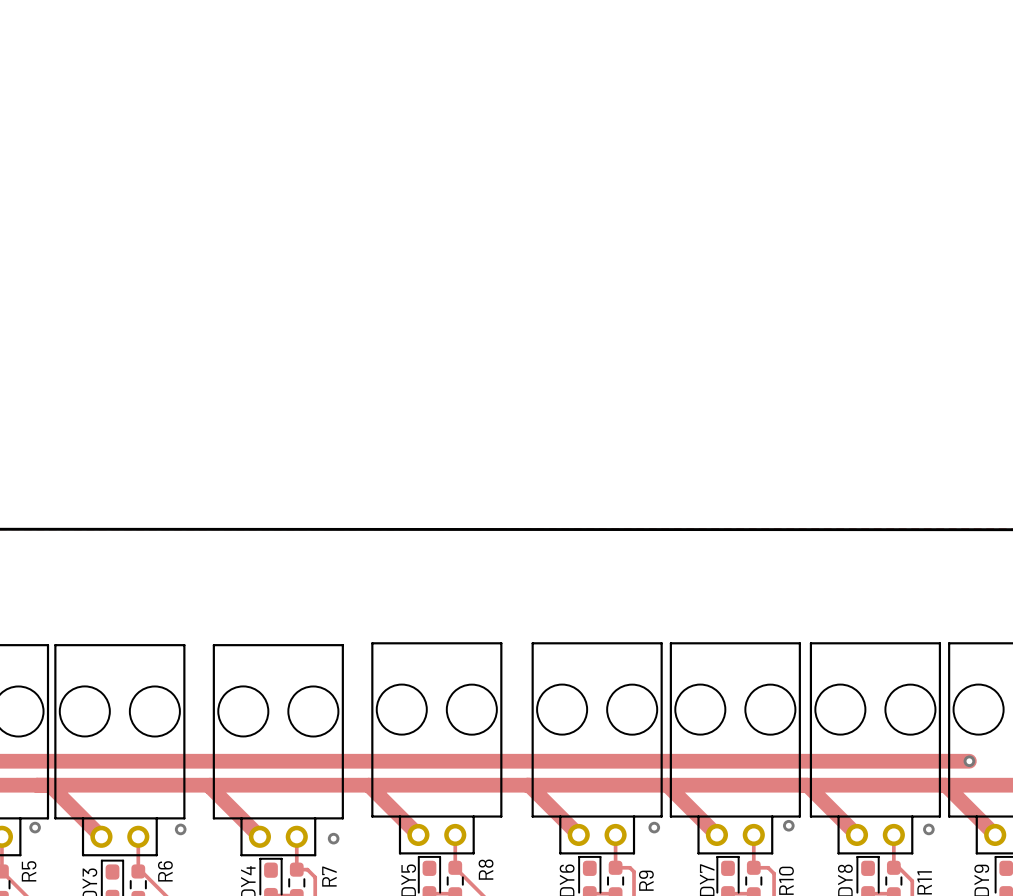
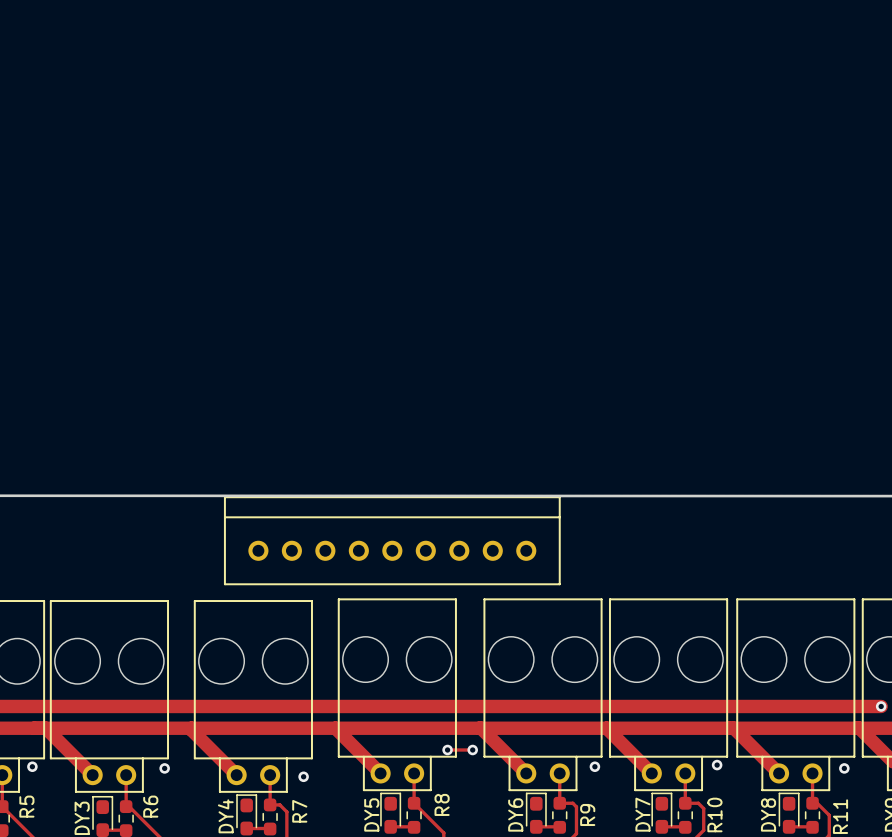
part: none -> (392, 540)
track: none -> (447, 750) (472, 750)
via: none -> (447, 750)
via: none -> (472, 750)

